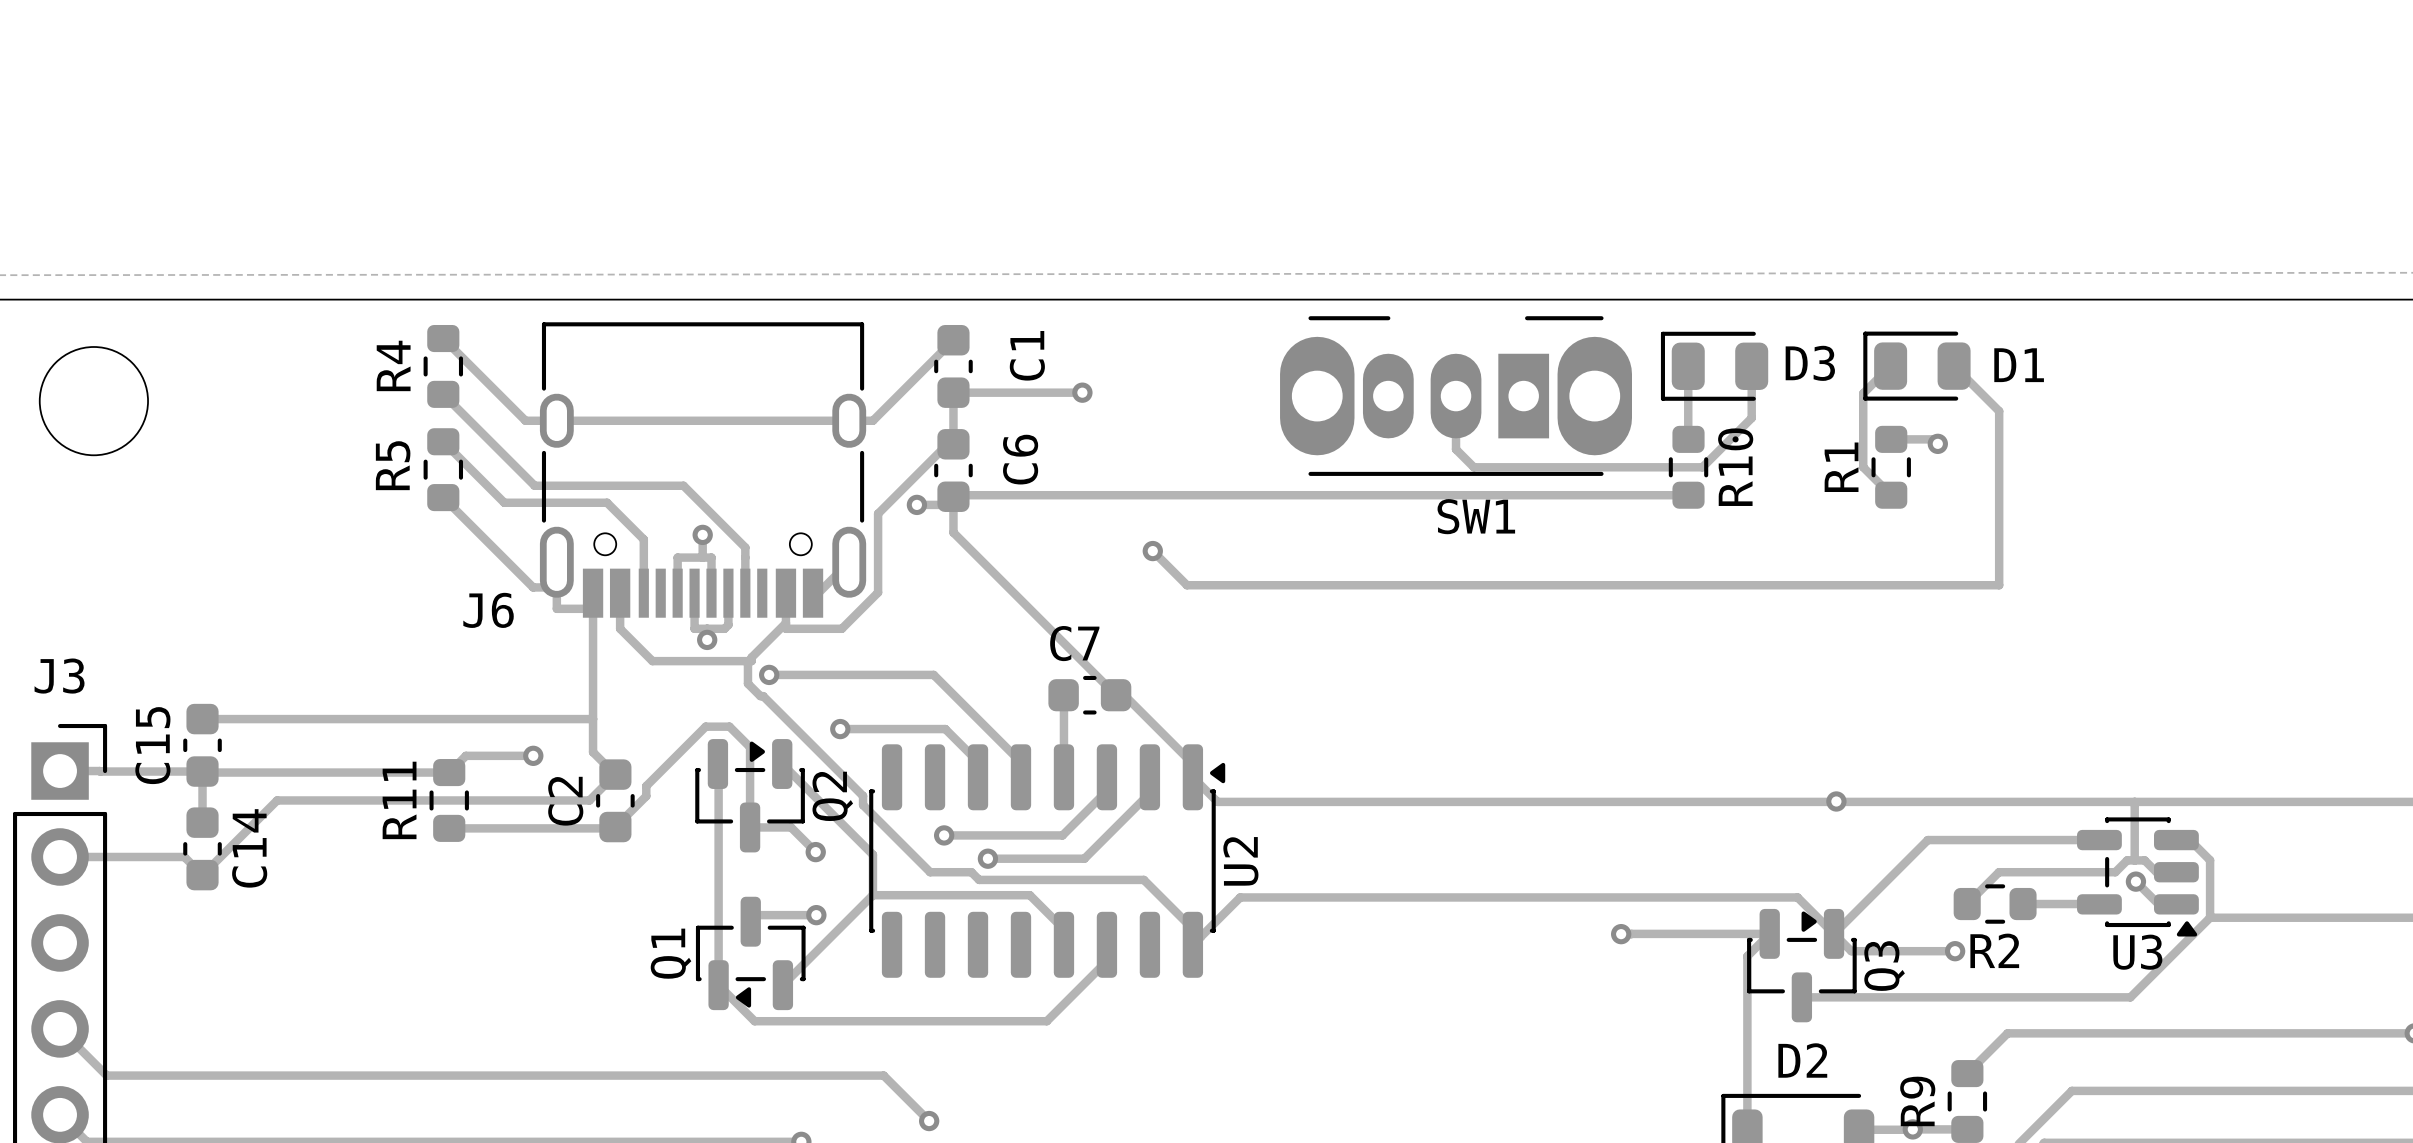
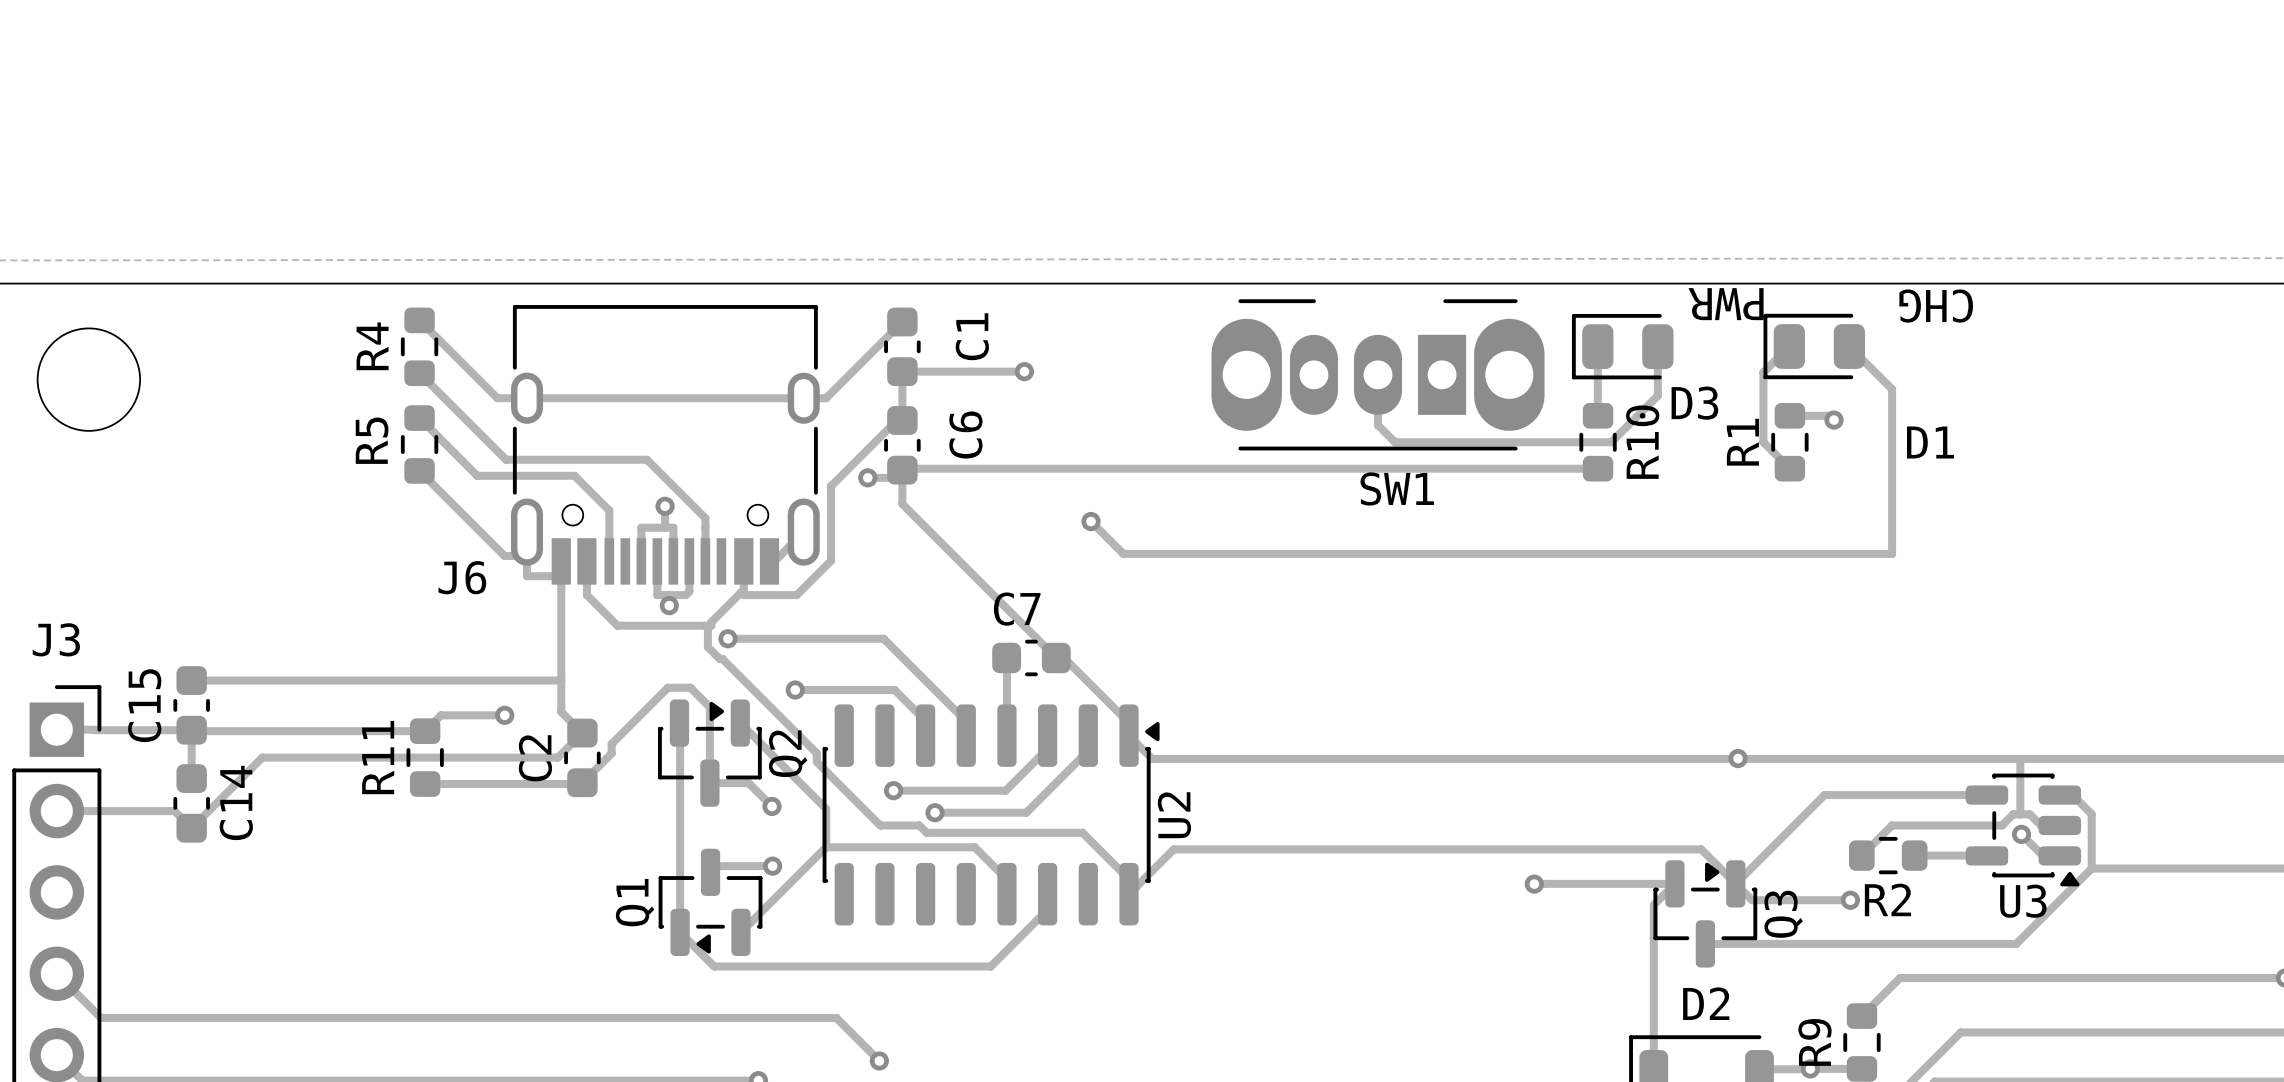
text: none -> PWR (1726, 304)
text: none -> CHG (1936, 306)
D3 name position: D3 (1810, 363) -> D3 (1694, 403)
D1 name position: D1 (2019, 365) -> D1 (1930, 442)

